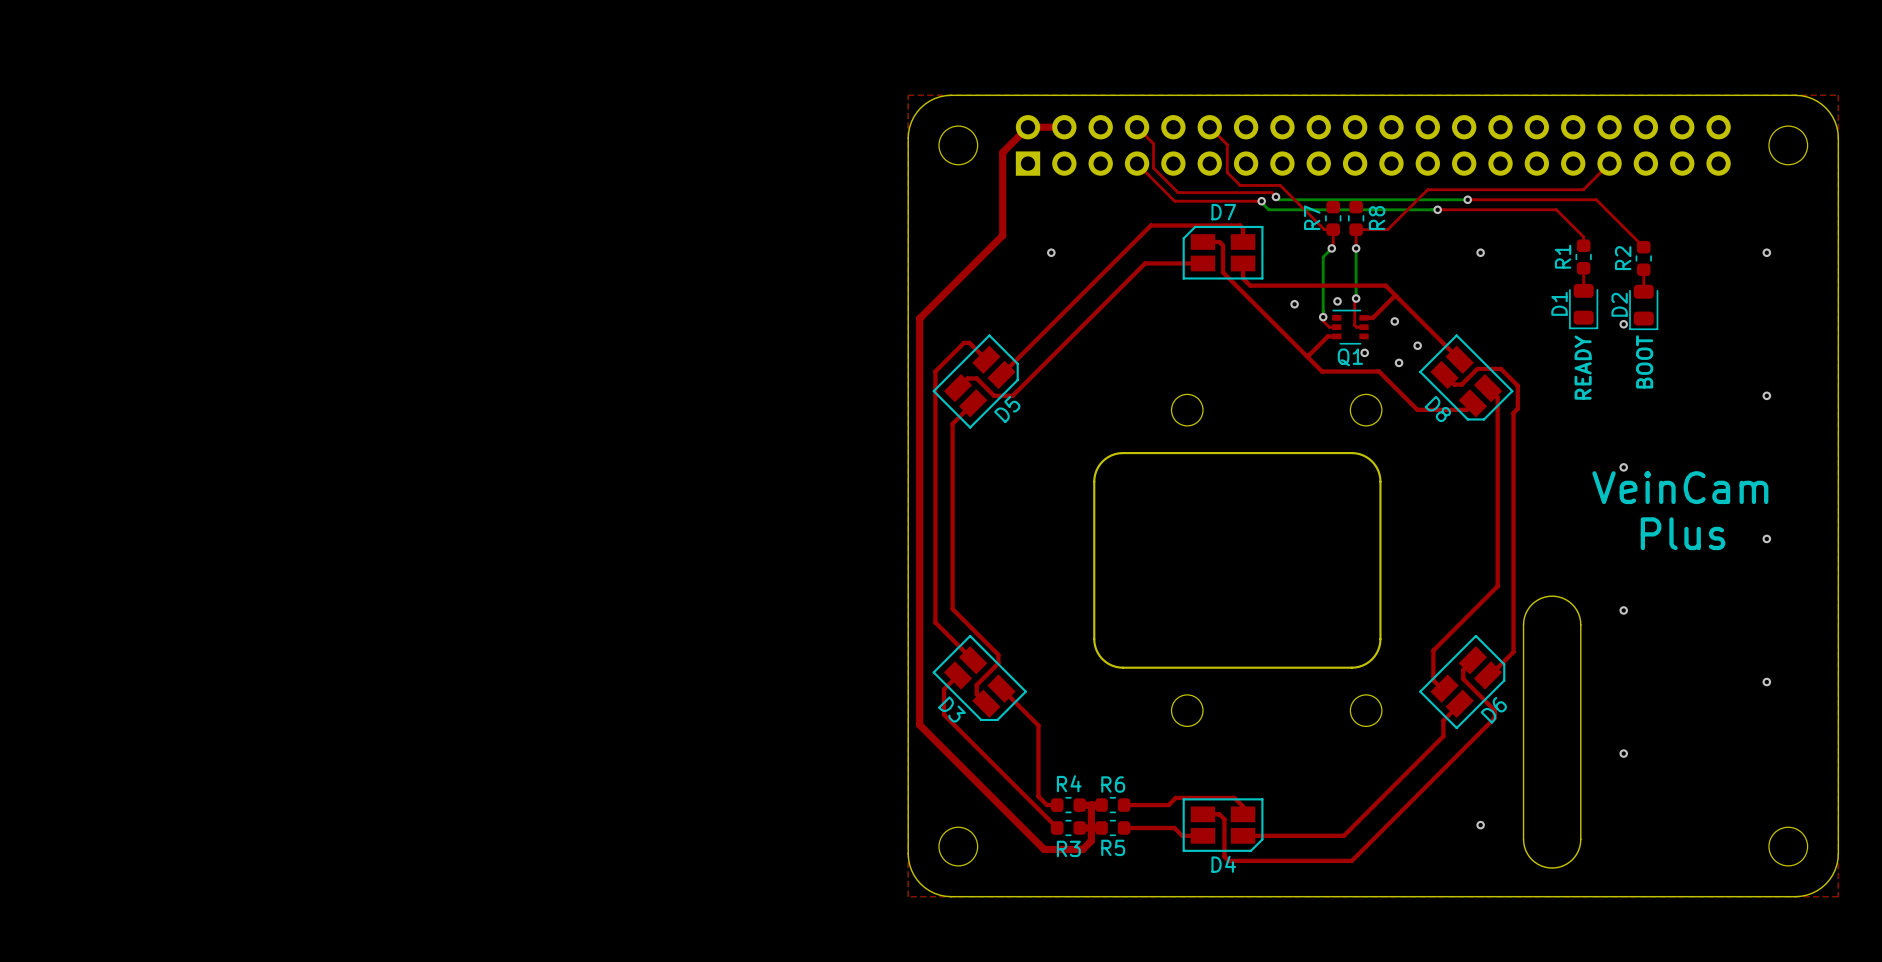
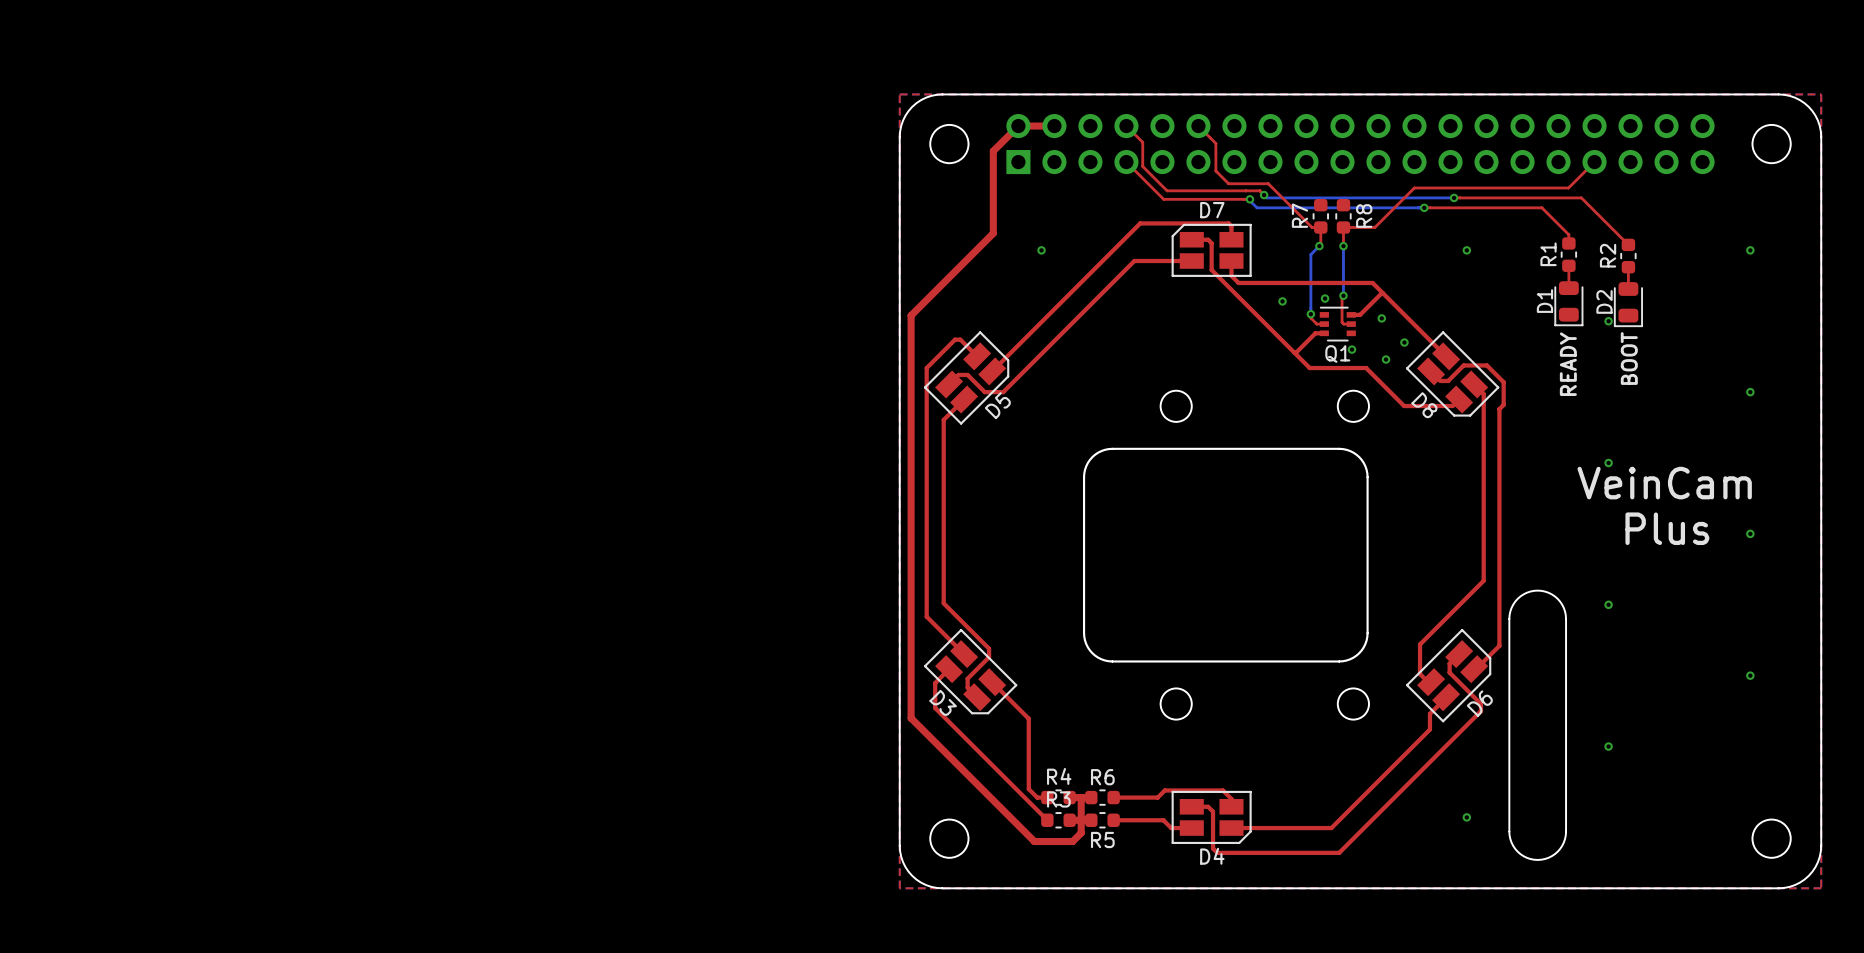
R3 name position: R3 (1068, 848) -> R3 (1058, 799)

